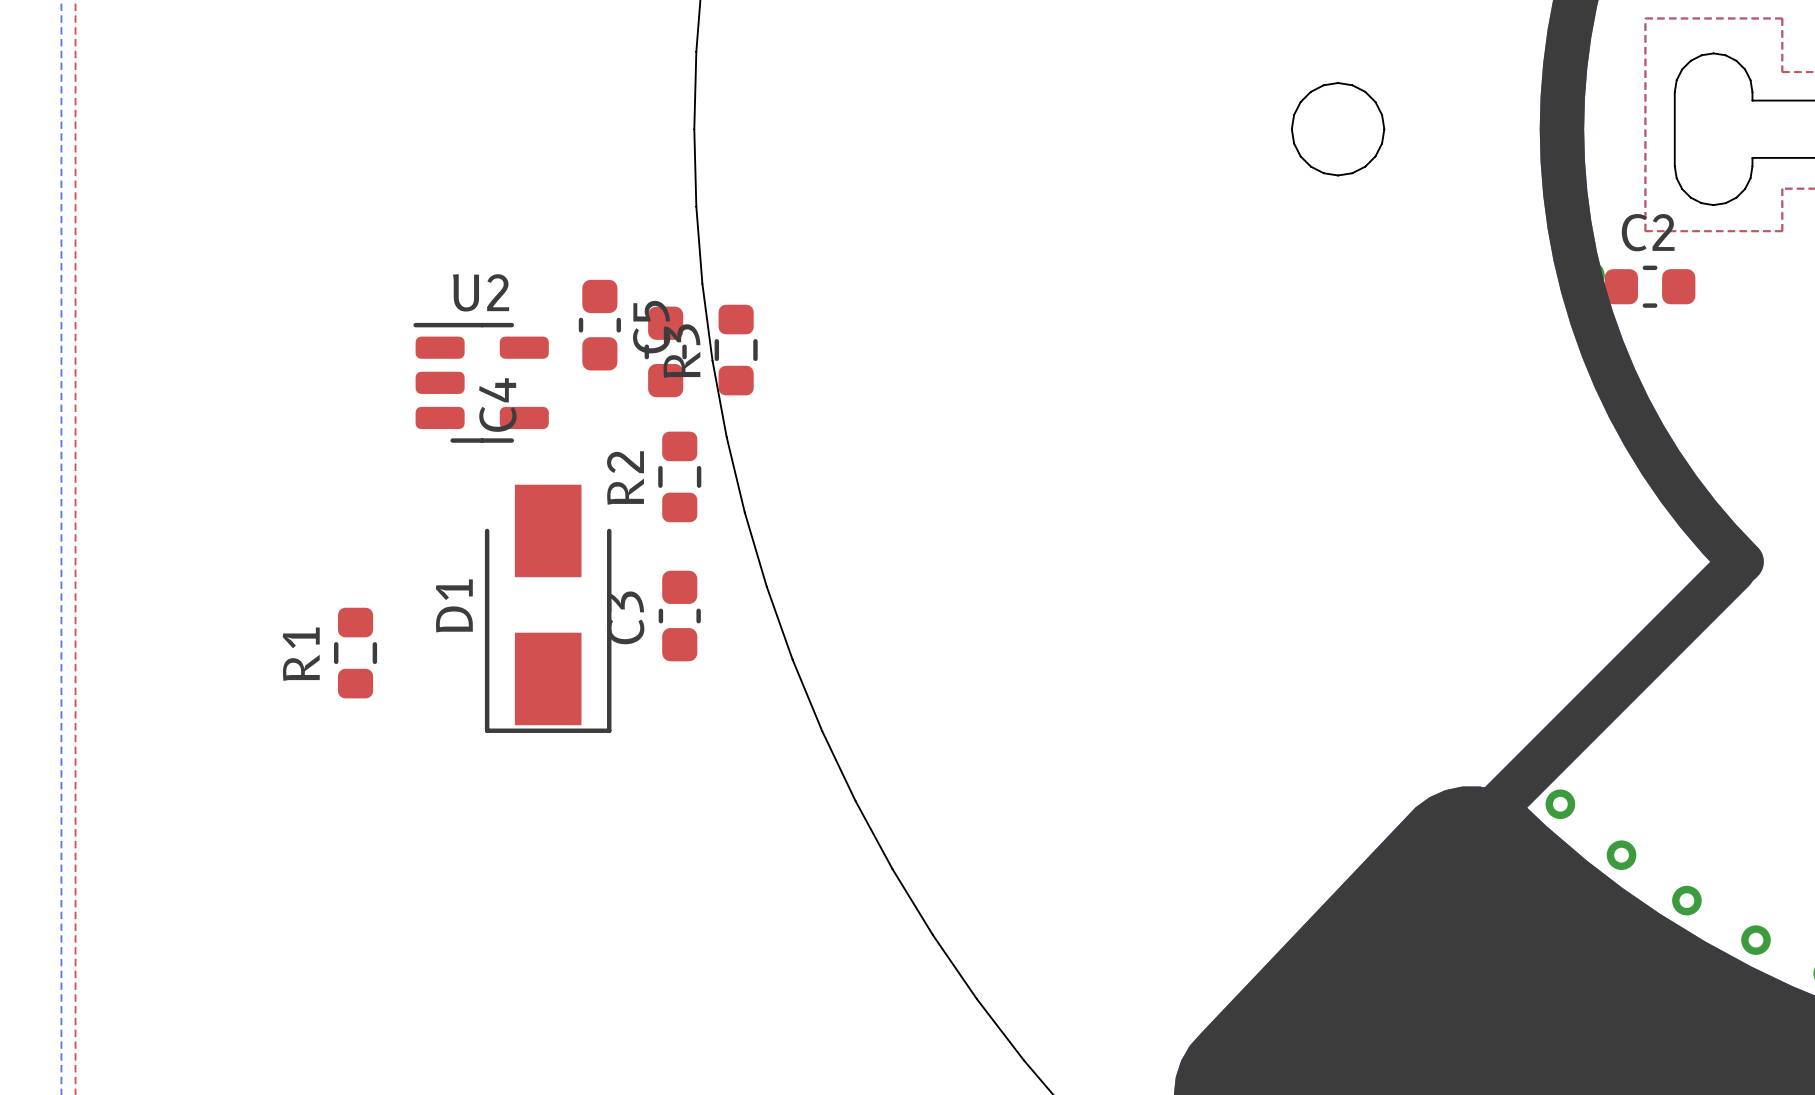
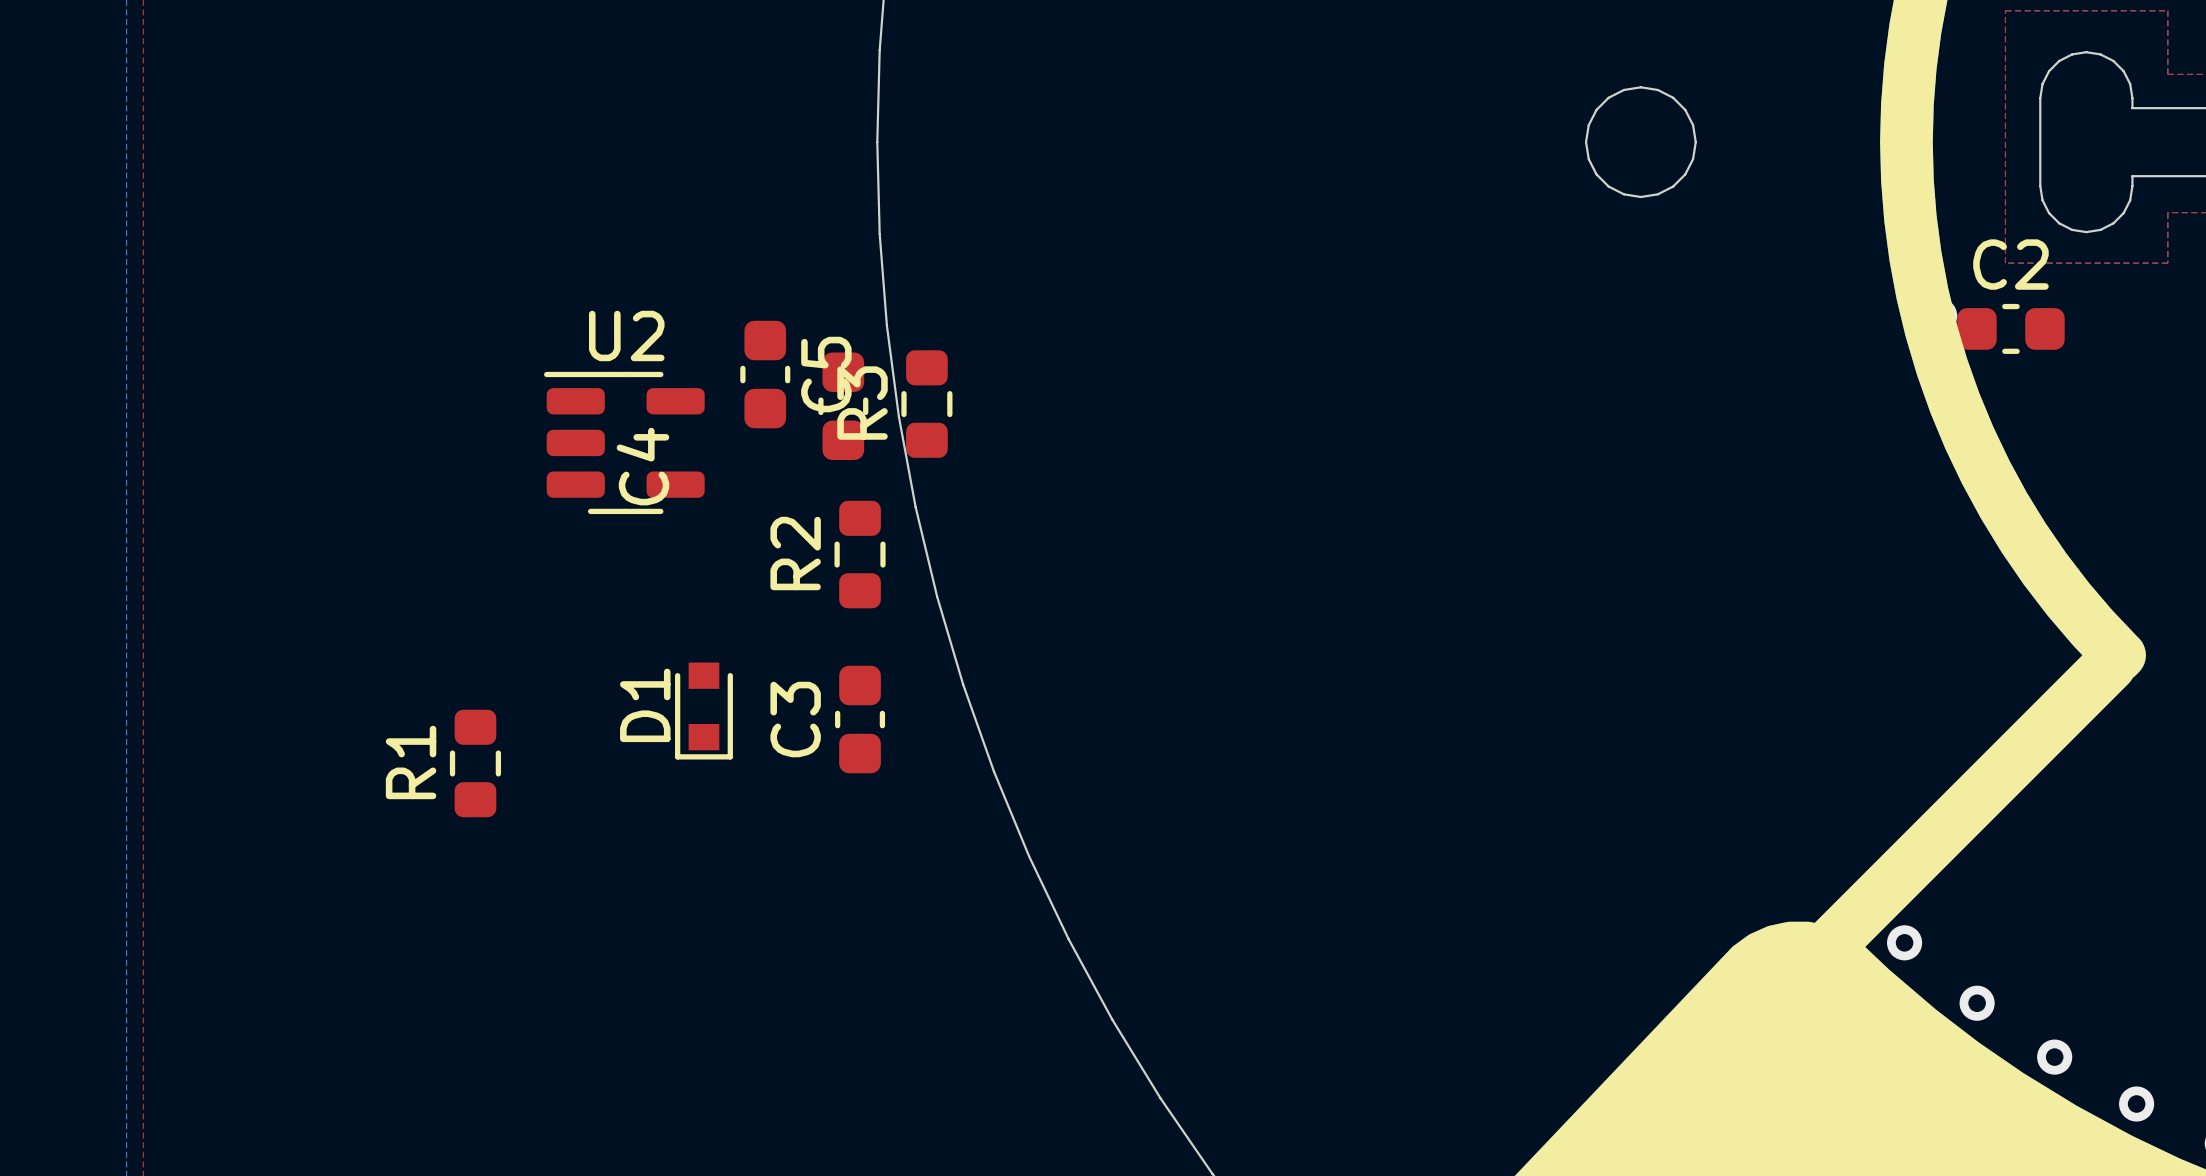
D1 footprint: [484, 484, 612, 733] -> [675, 662, 733, 760]

